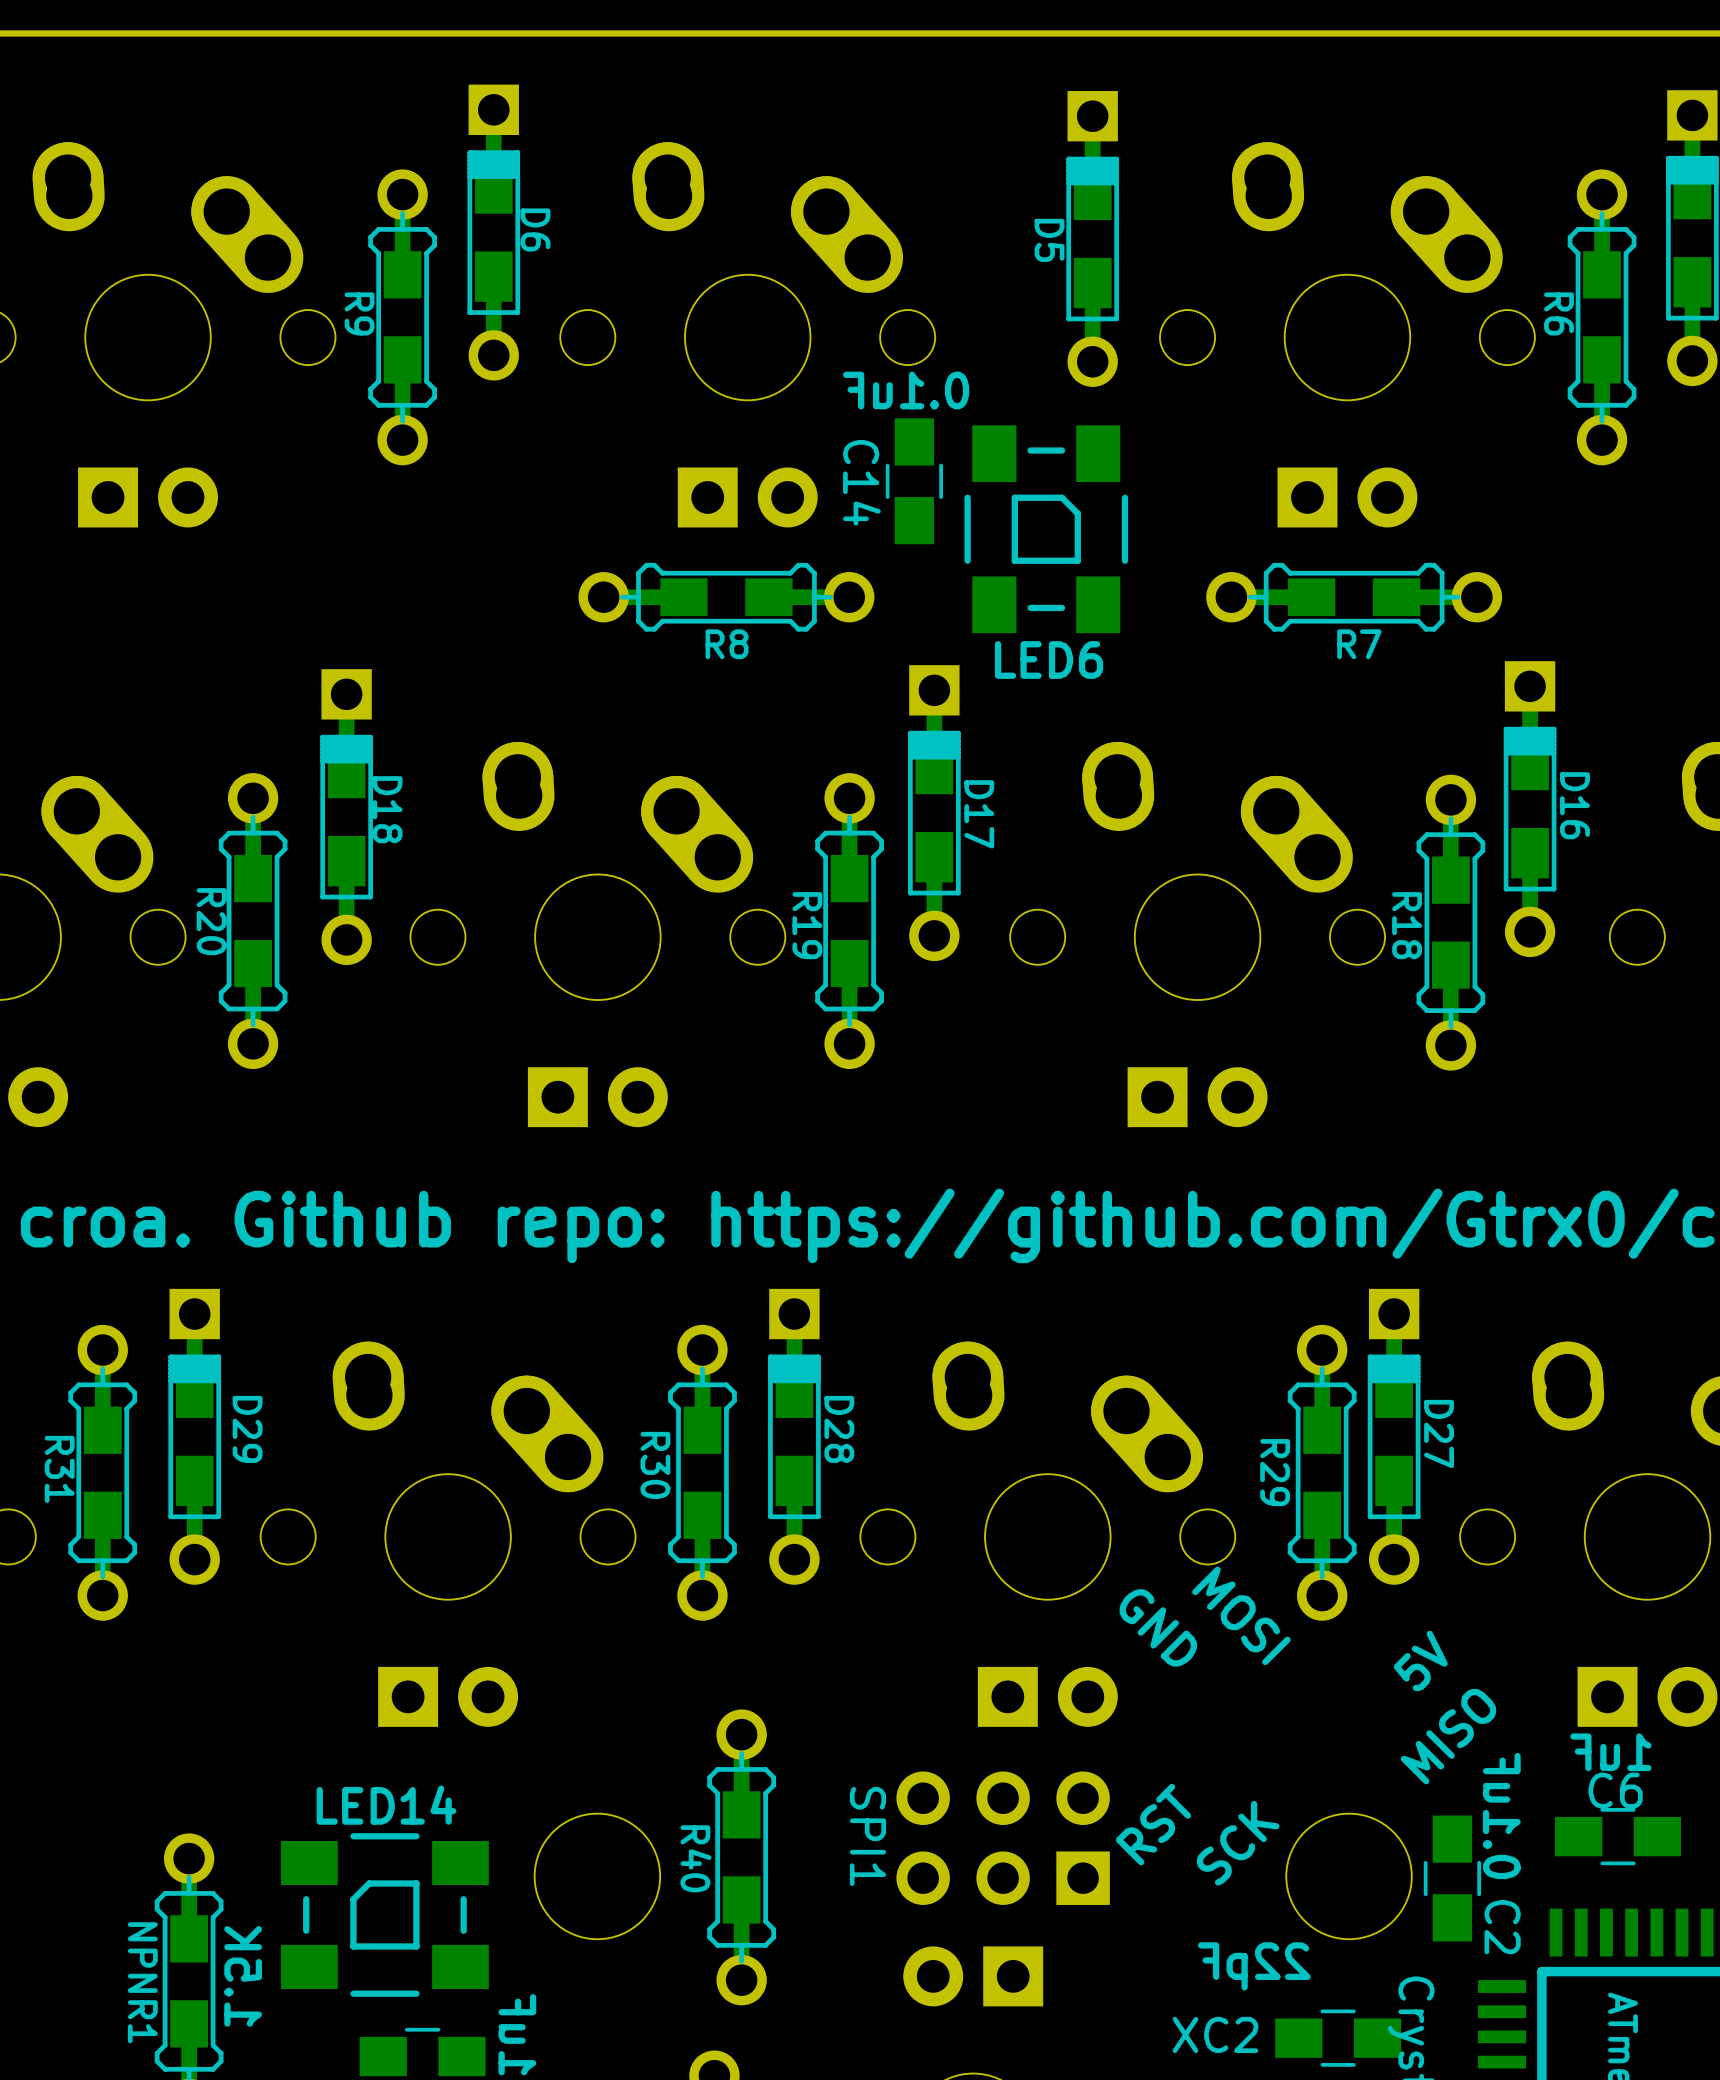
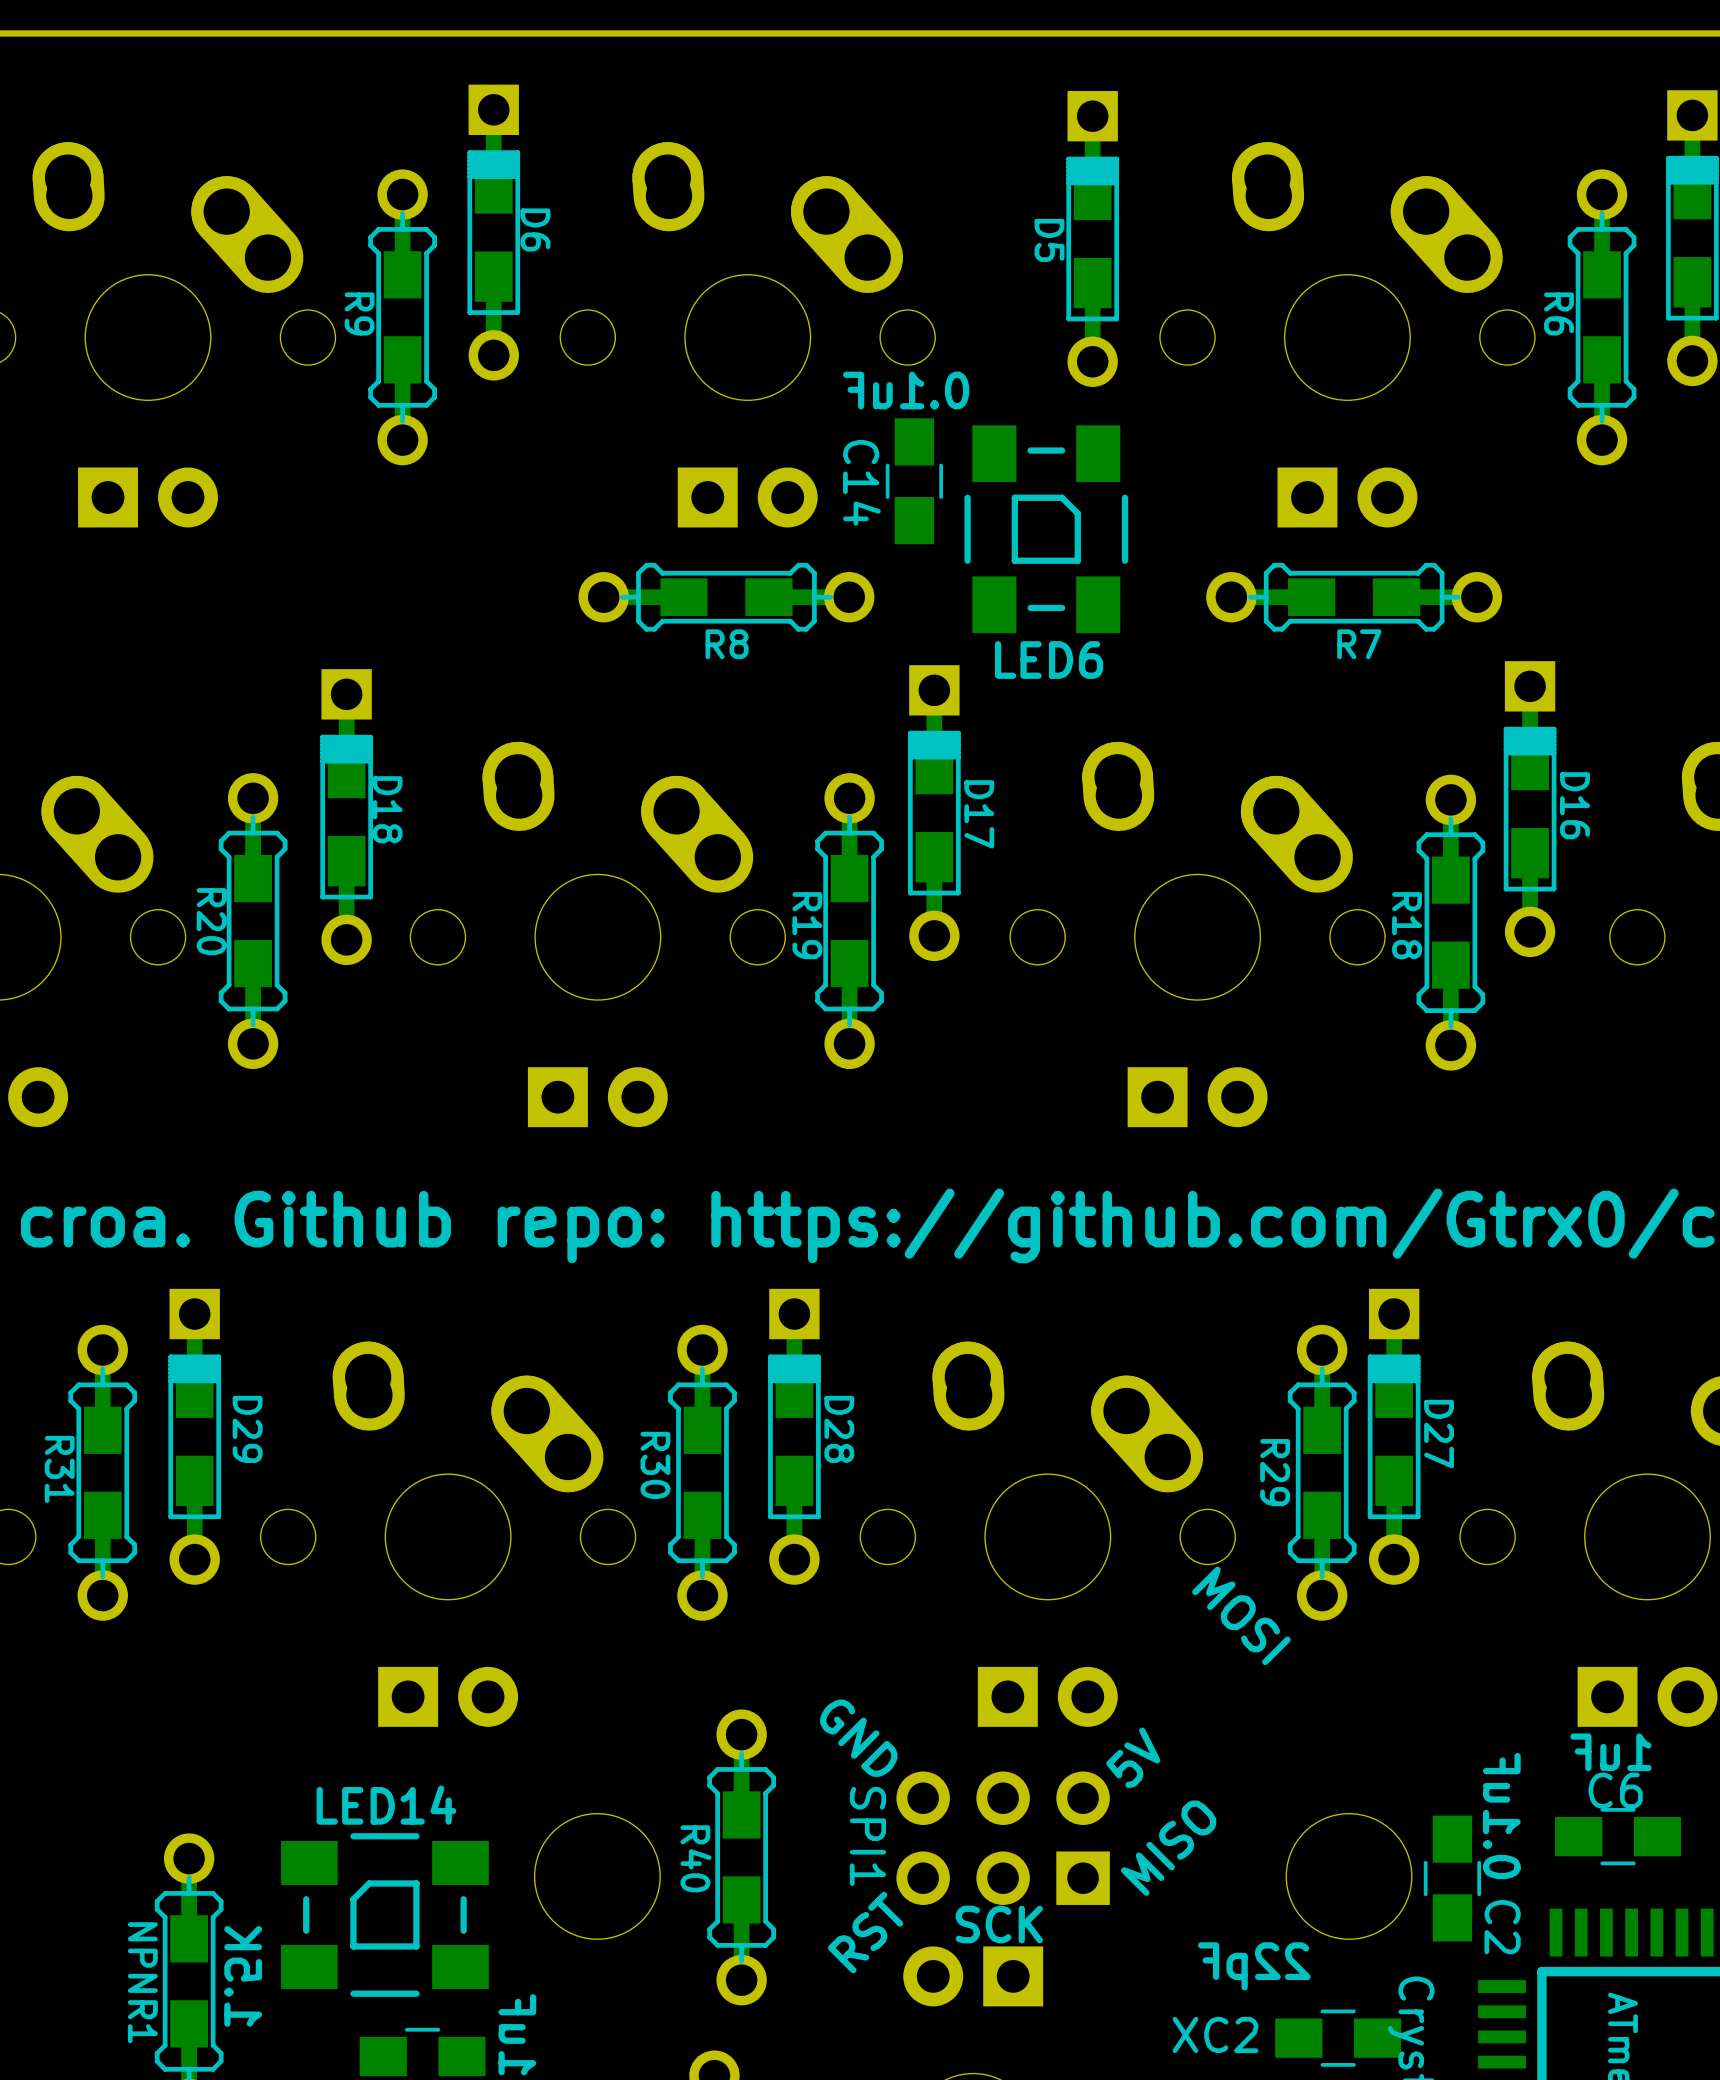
text position: GND (1158, 1627) -> GND (858, 1738)
text position: 5V (1420, 1660) -> 5V (1133, 1757)
text position: MISO (1448, 1736) -> MISO (1168, 1848)
text position: RST (1153, 1824) -> RST (865, 1932)
text rotation: 0° (1238, 1843) -> 45° clockwise (999, 1924)
text position: SCK (1238, 1843) -> SCK (999, 1924)

